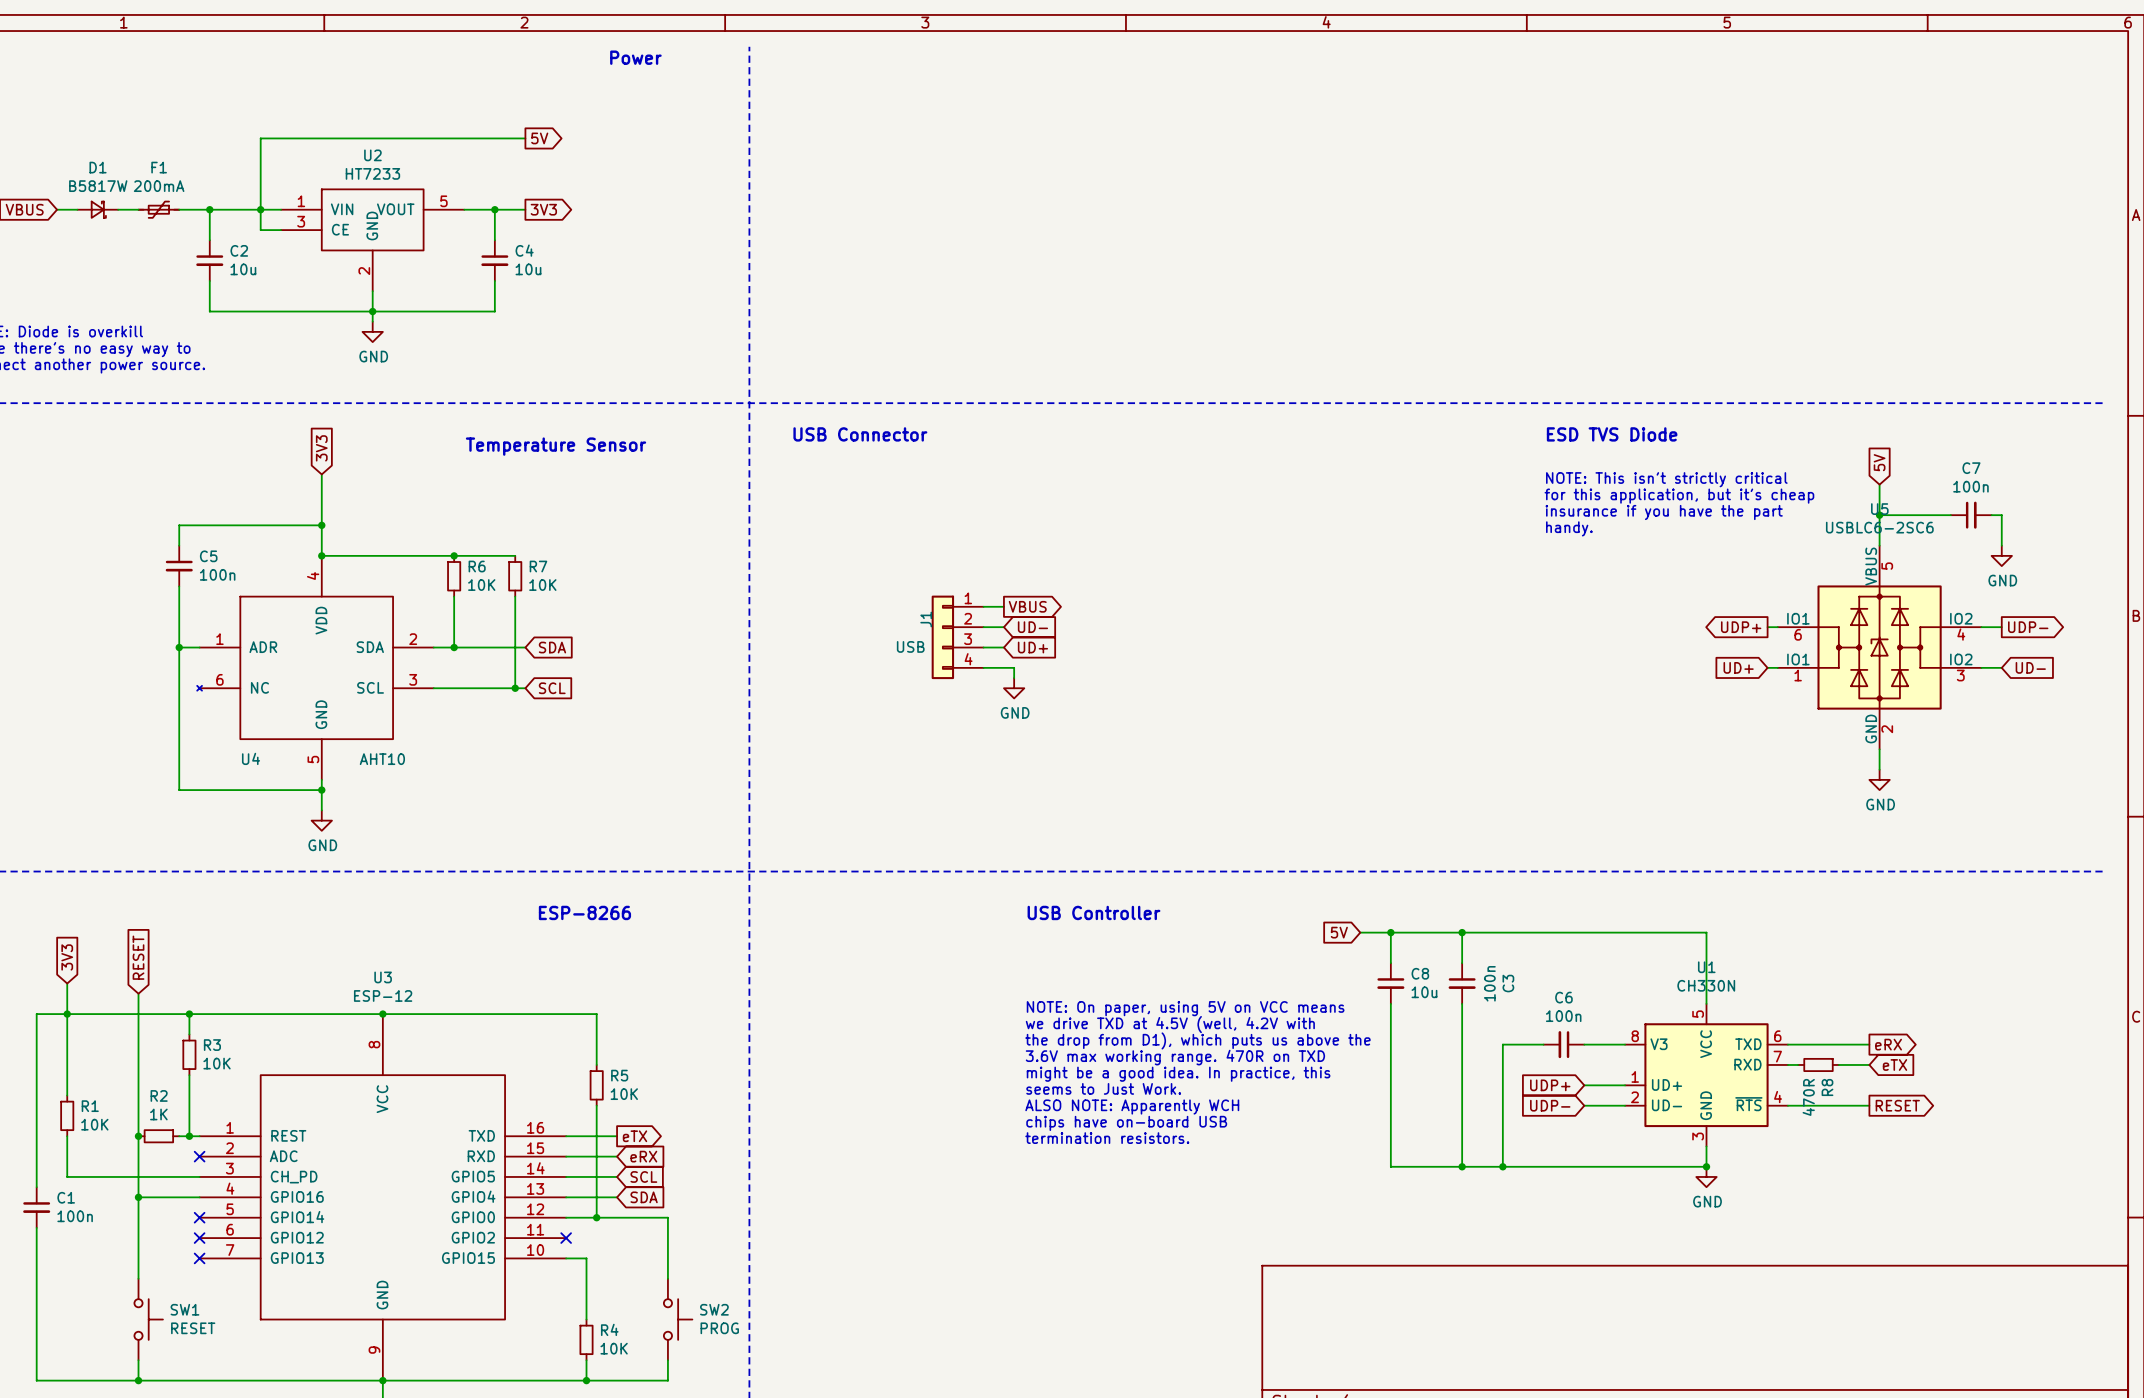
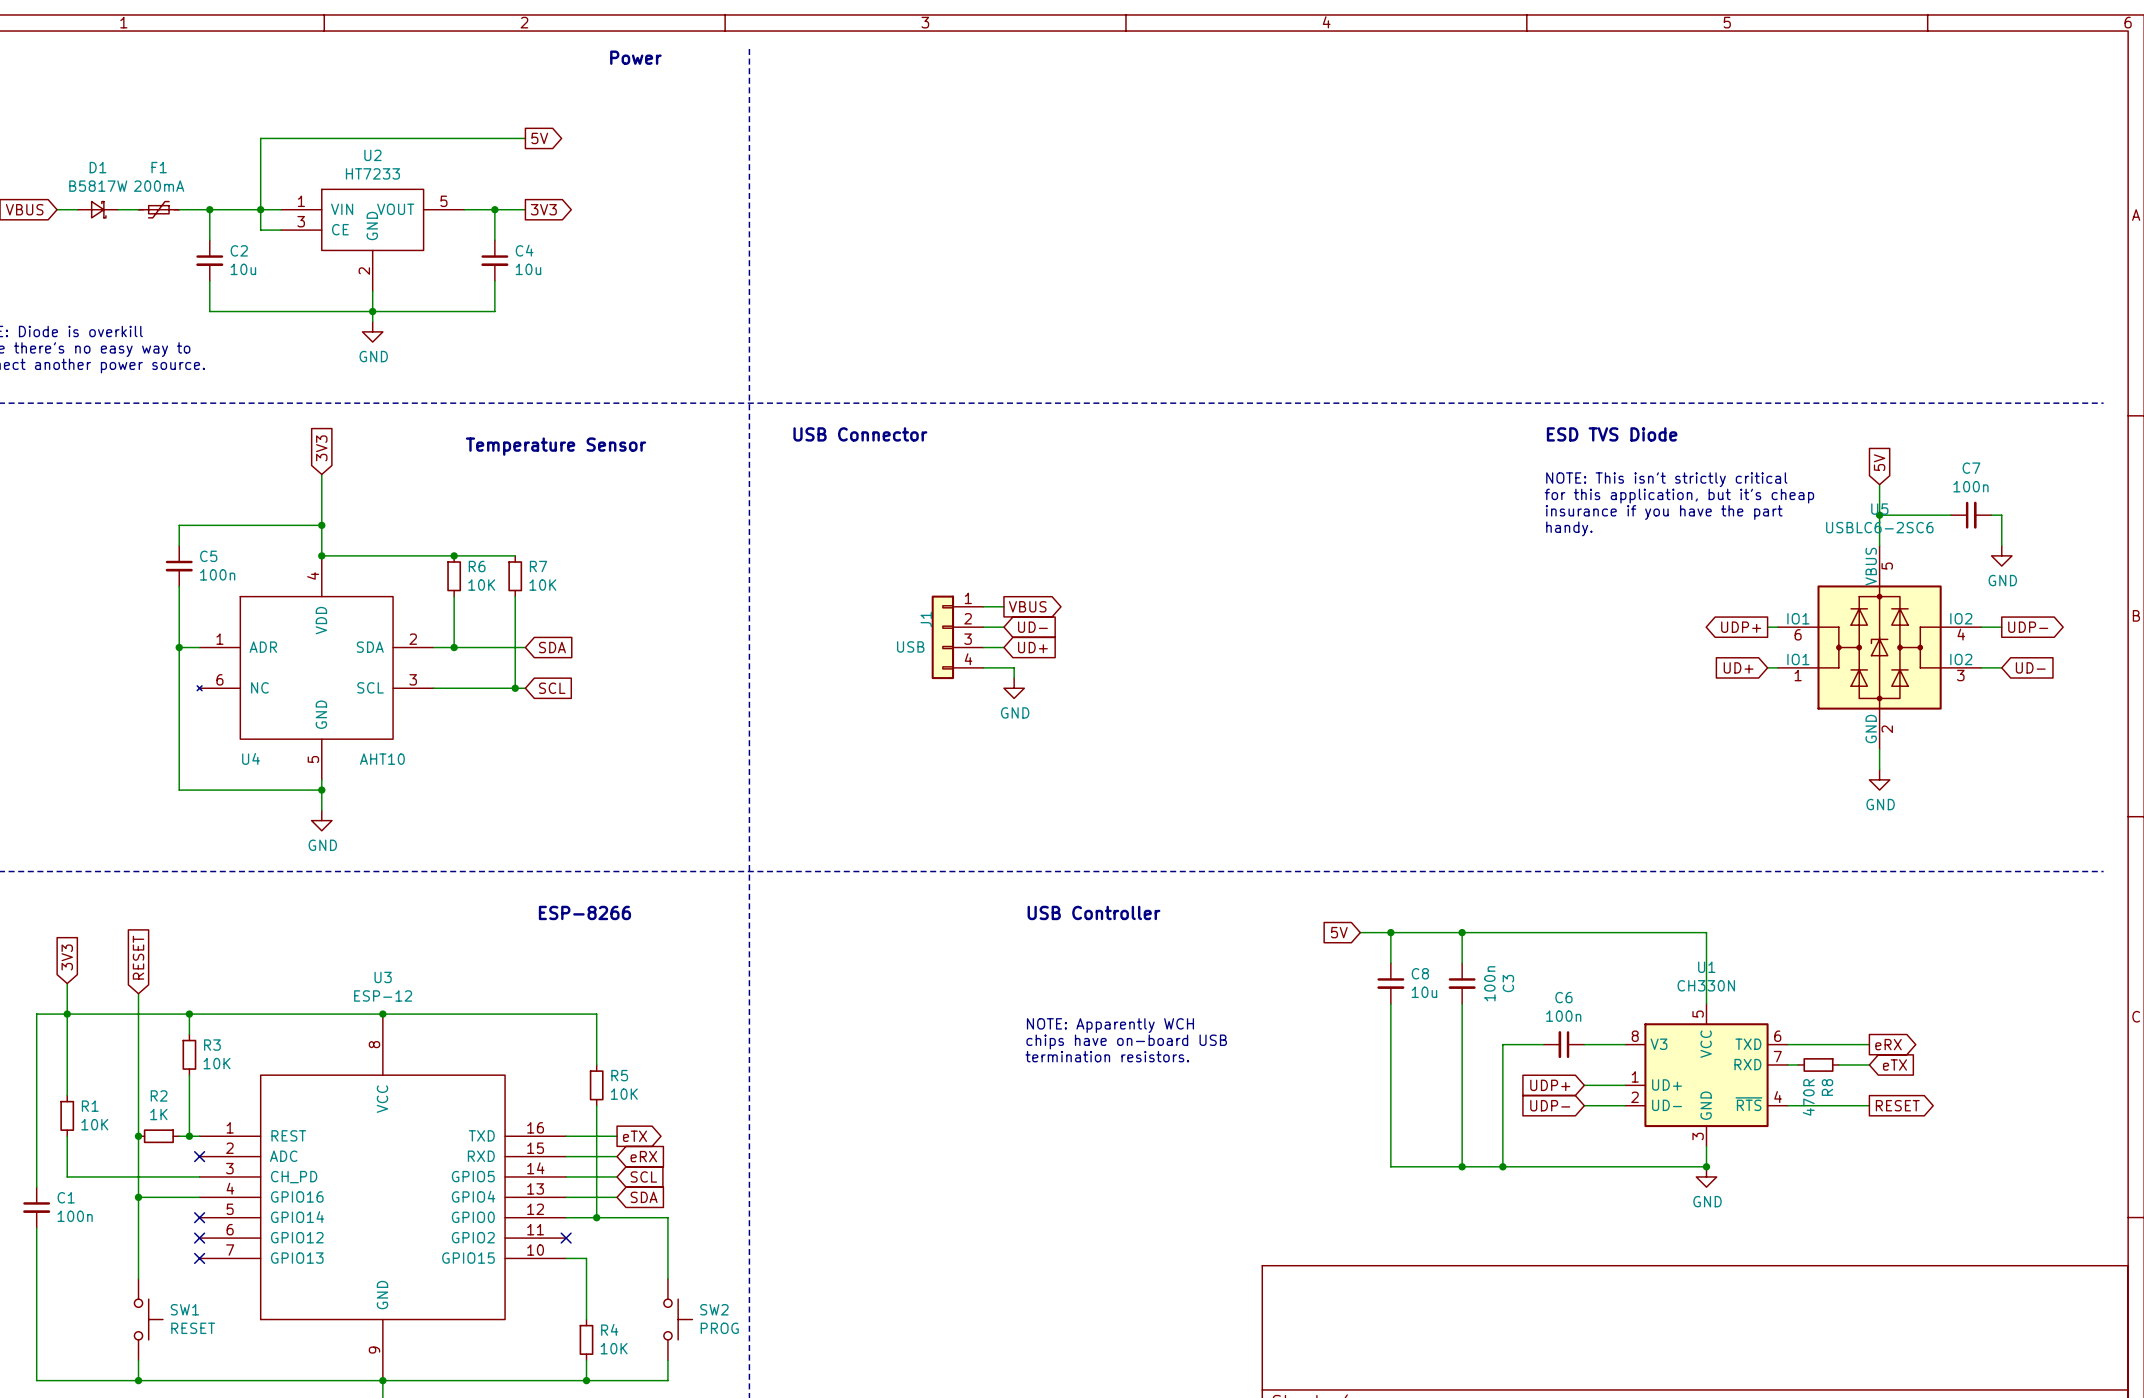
text: NOTE: On paper, using 5V on VCC means (1185, 1008) -> none
text: we drive TXD at 4.5V (well, 4.2V with (1170, 1024) -> NOTE: Apparently WCH (1110, 1025)
text: the drop from D1), which puts us above the (1197, 1040) -> chips have on-board USB (1126, 1041)
text: 3.6V max working range. 470R on TXD (1175, 1057) -> termination resistors. (1107, 1056)
text: might be a good idea. In practice, this (1178, 1074) -> none
text: seems to Just Work. (1103, 1088) -> none
text: ALSO NOTE: Apparently WCH (1132, 1107) -> none
text: chips have on-board USB (1126, 1123) -> none
text: termination resistors. (1107, 1138) -> none

